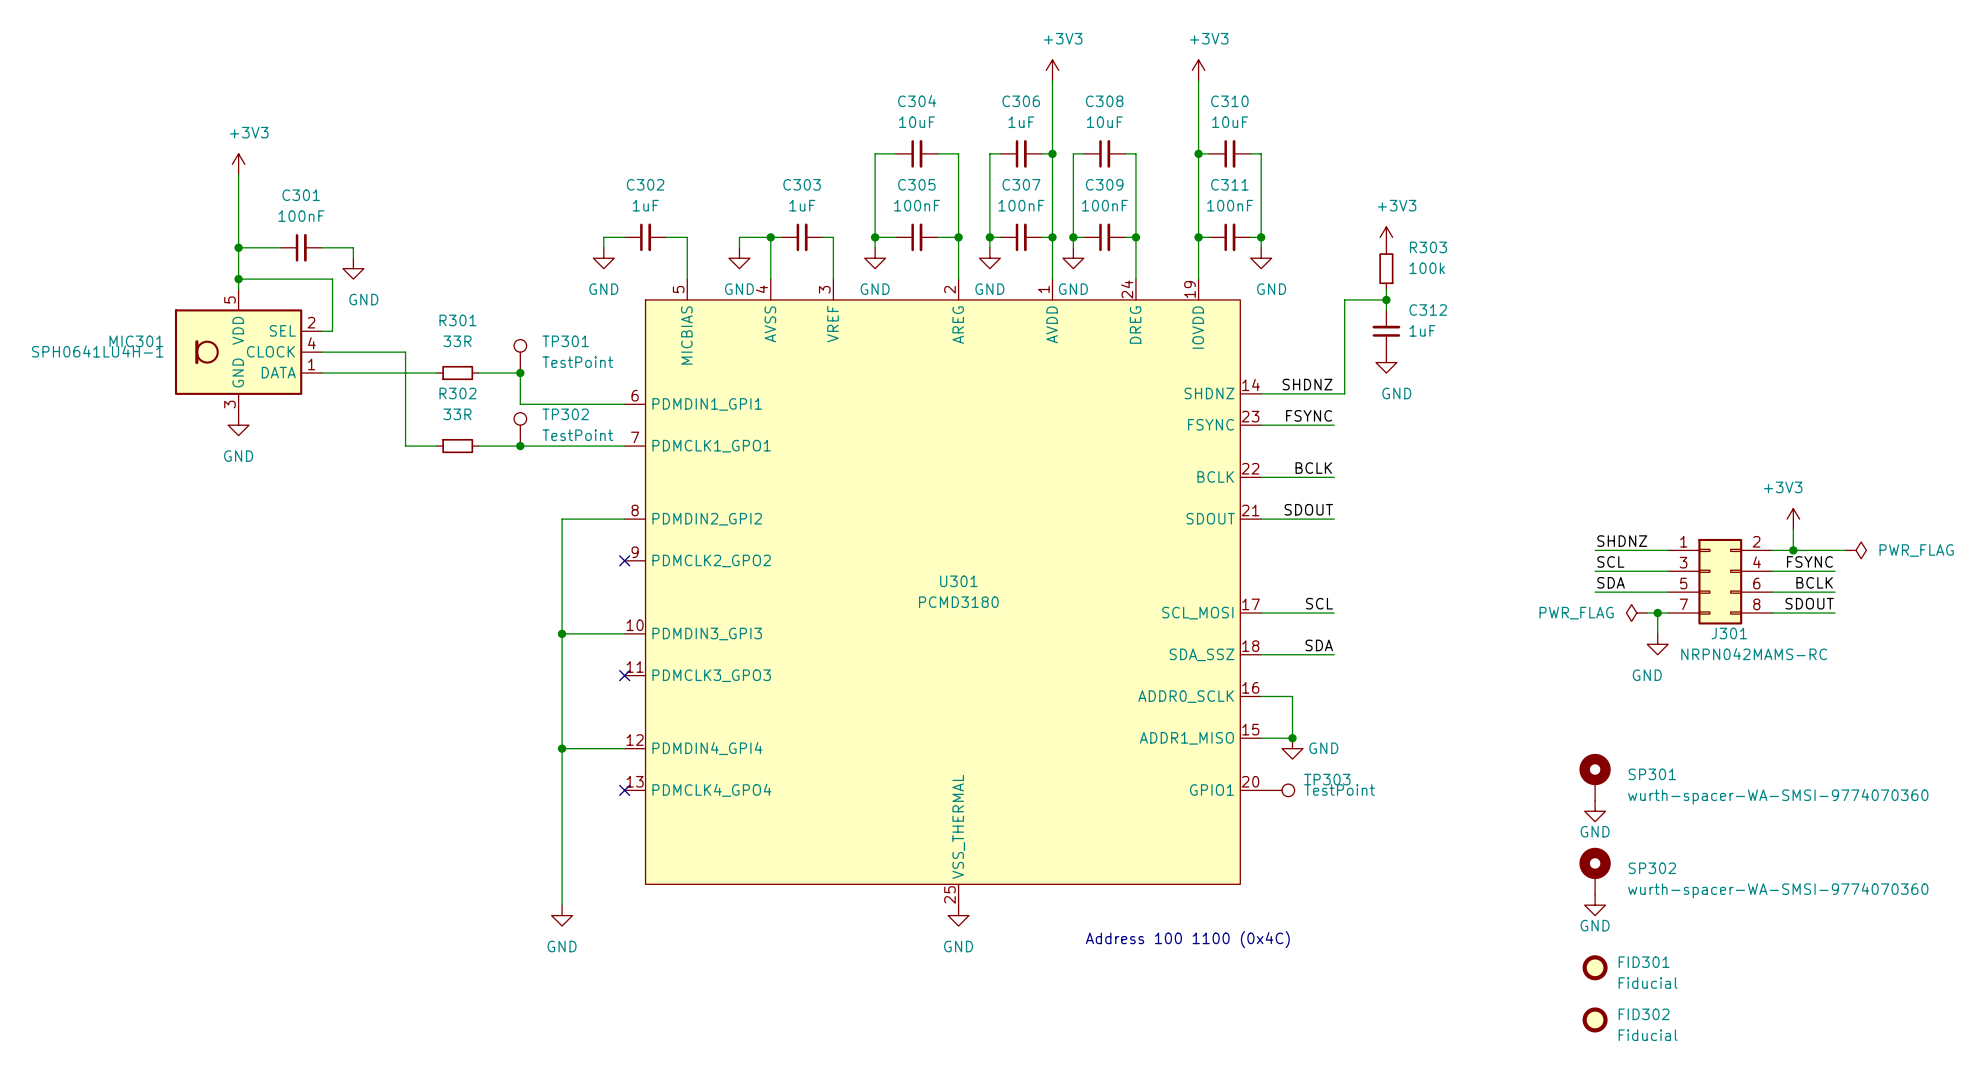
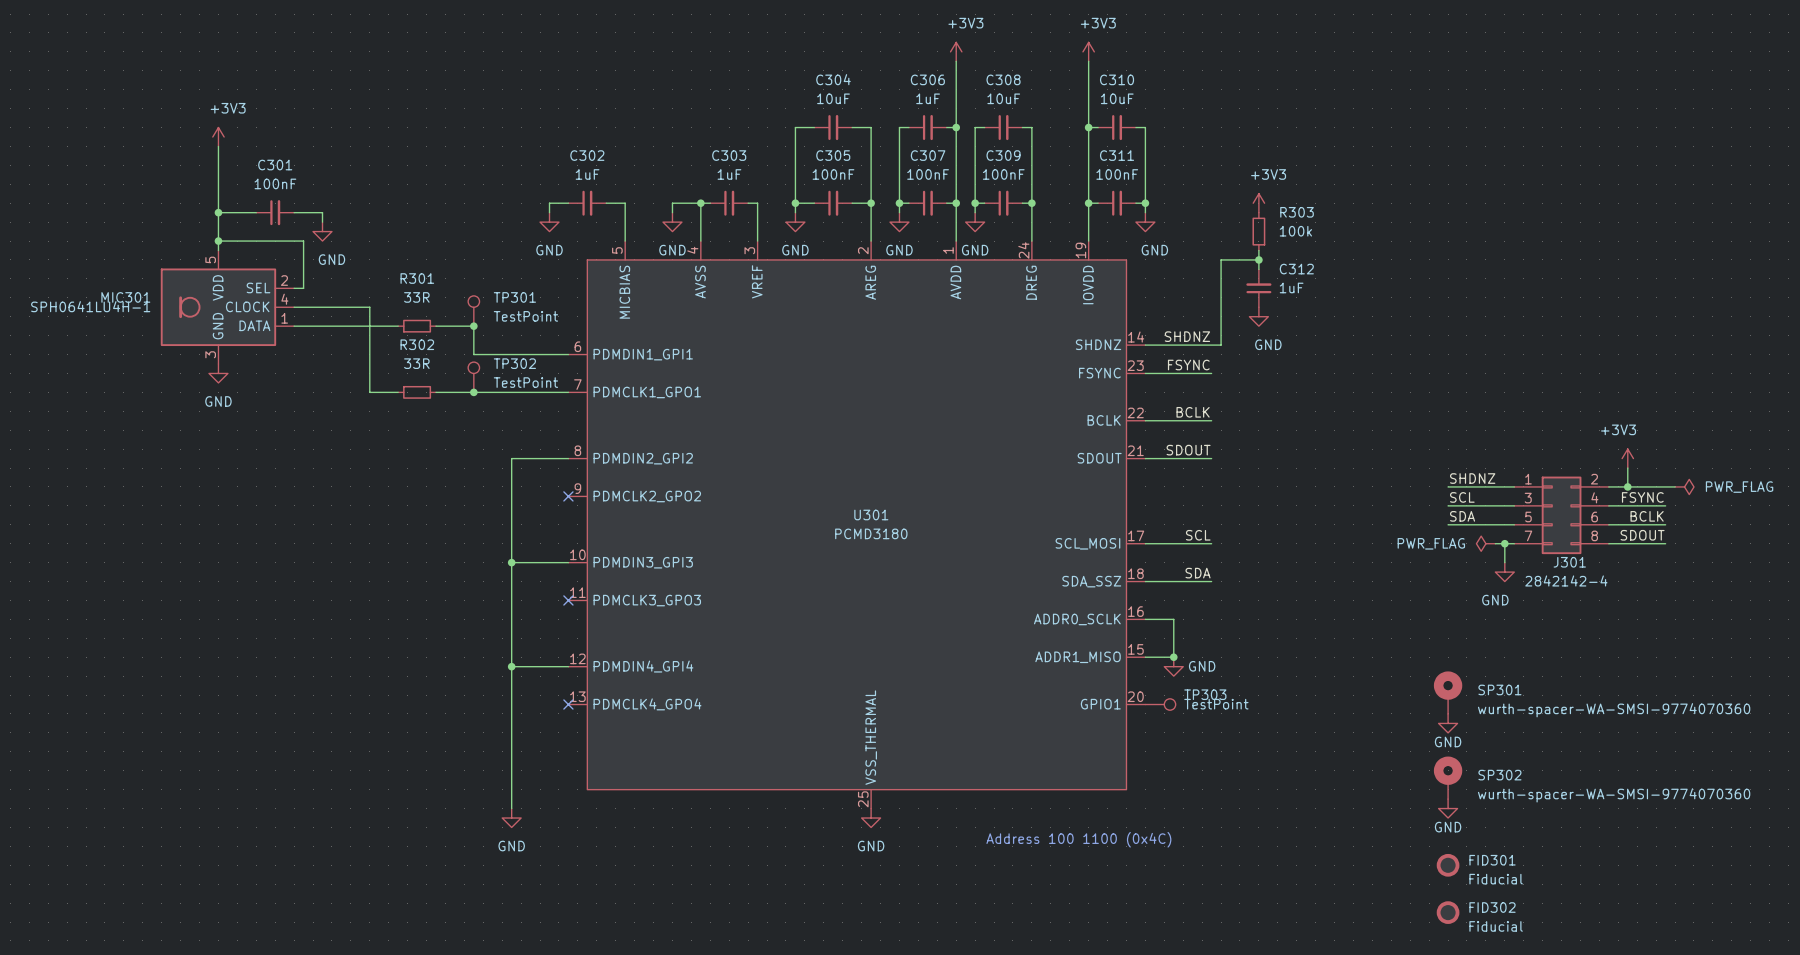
J301 value: NRPN042MAMS-RC (1754, 654) -> 2842142-4 (1566, 580)

